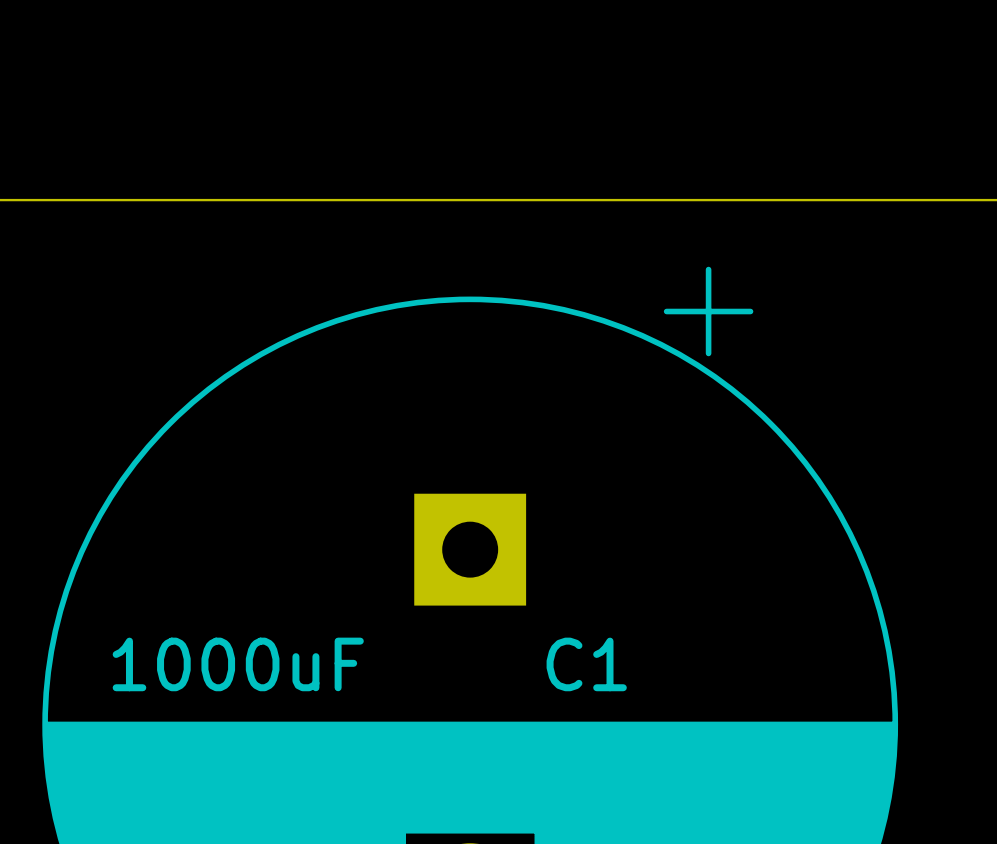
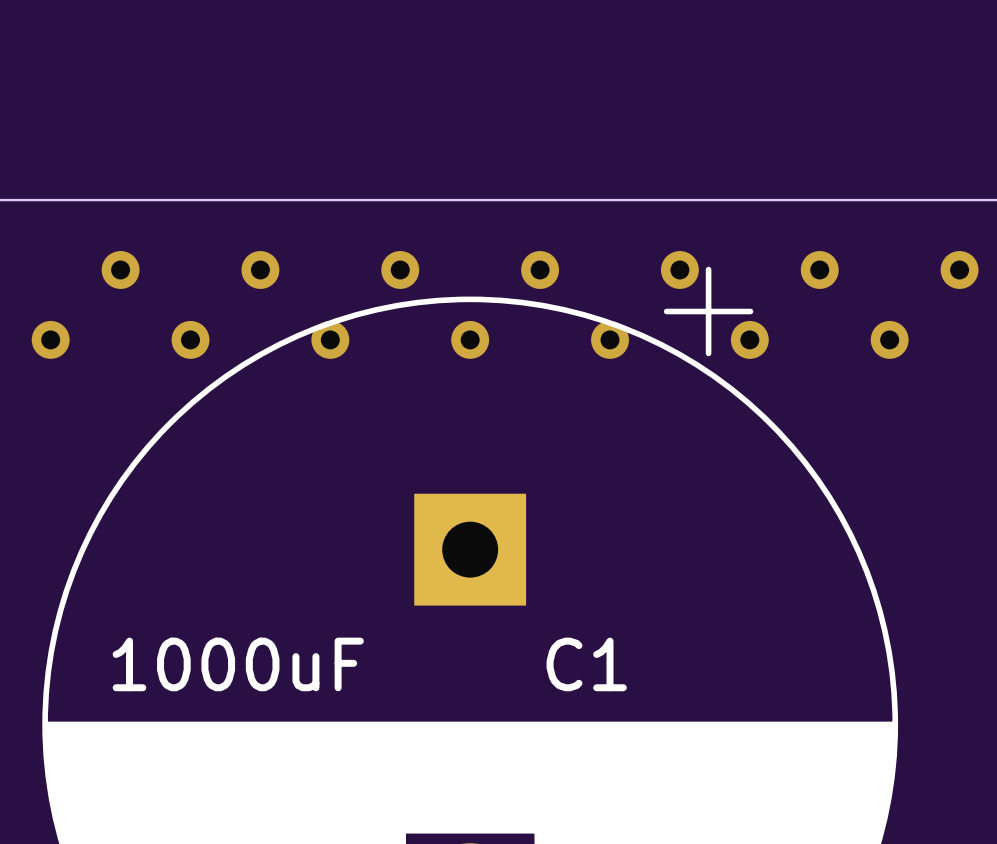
via: none -> (120, 269)
via: none -> (260, 269)
via: none -> (400, 269)
via: none -> (540, 269)
via: none -> (679, 269)
via: none -> (819, 269)
via: none -> (959, 269)
via: none -> (50, 339)
via: none -> (190, 339)
via: none -> (330, 339)
via: none -> (470, 339)
via: none -> (610, 339)
via: none -> (749, 339)
via: none -> (889, 339)

